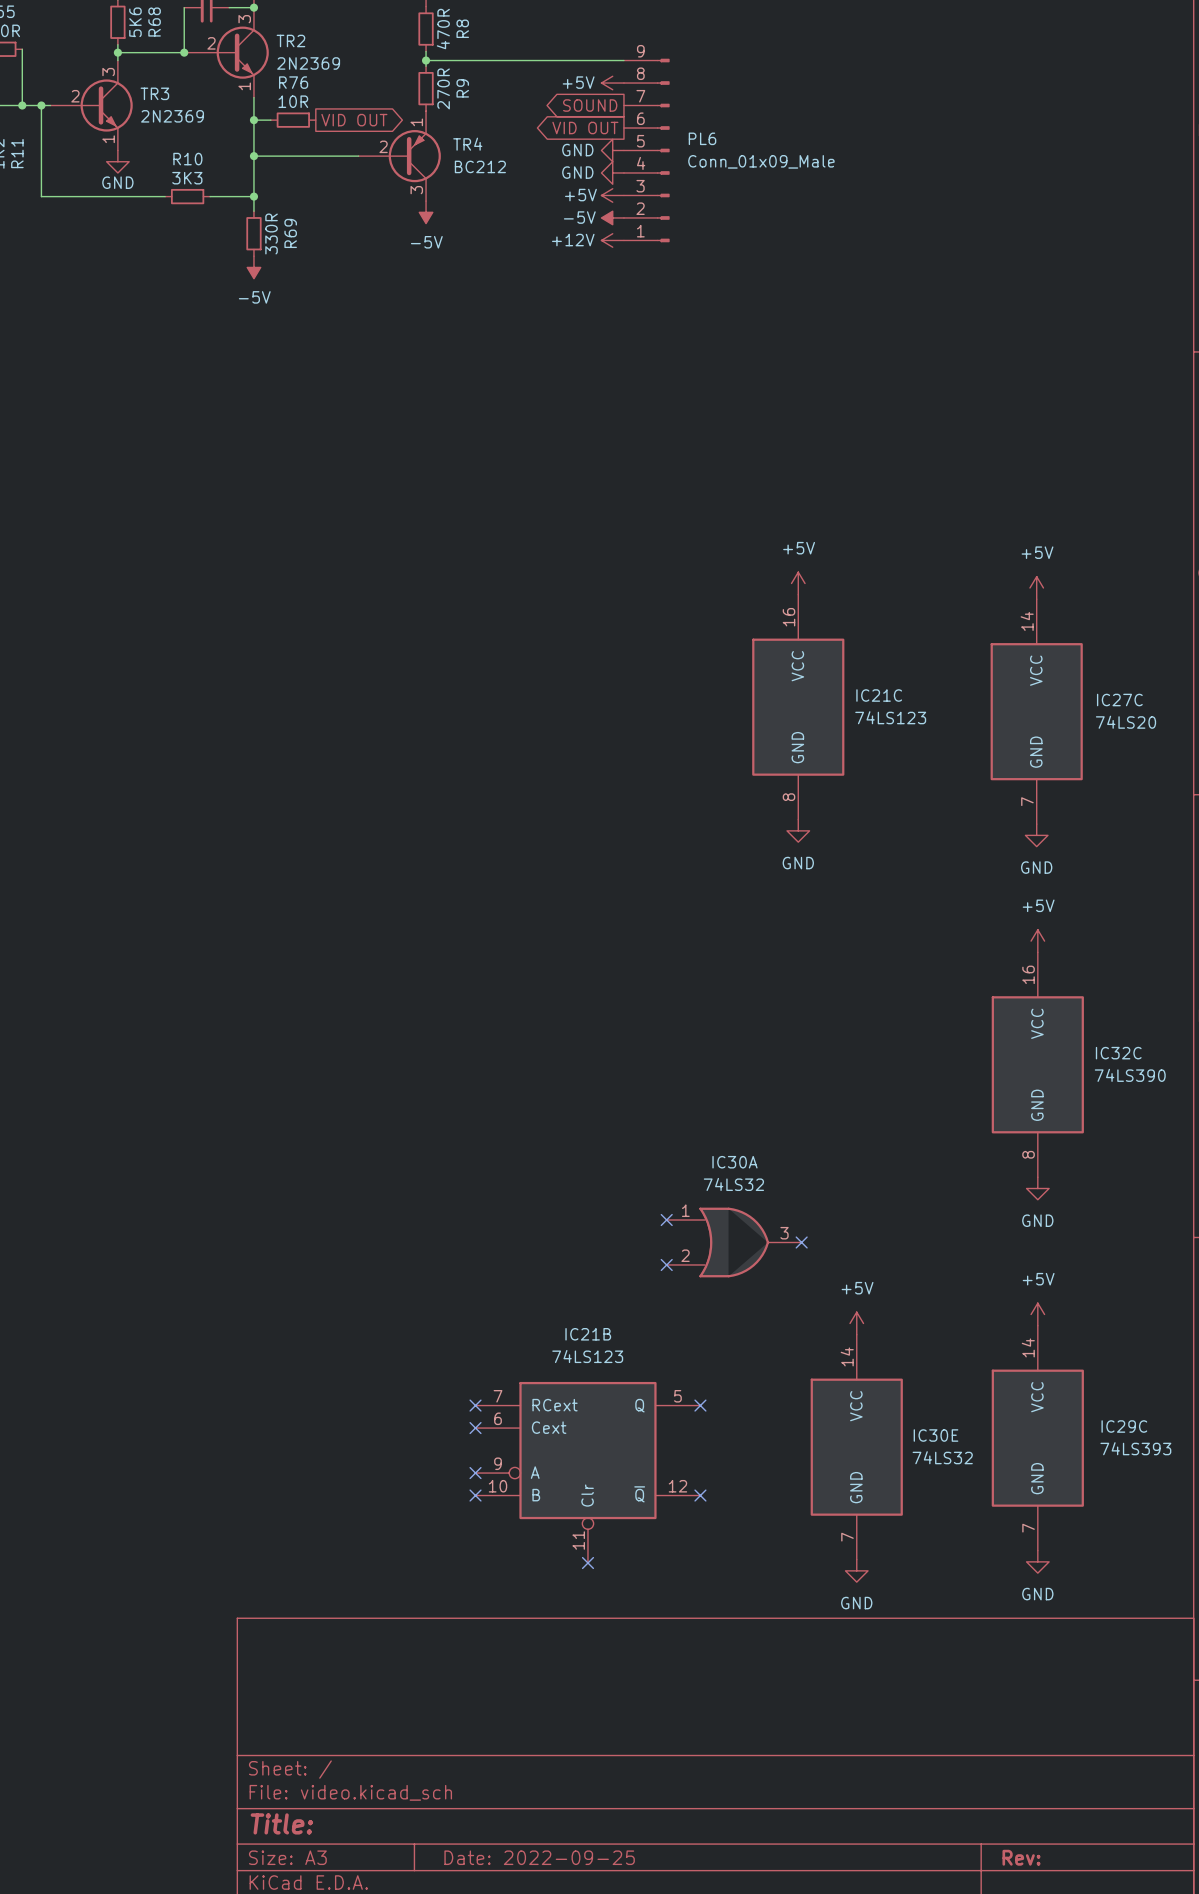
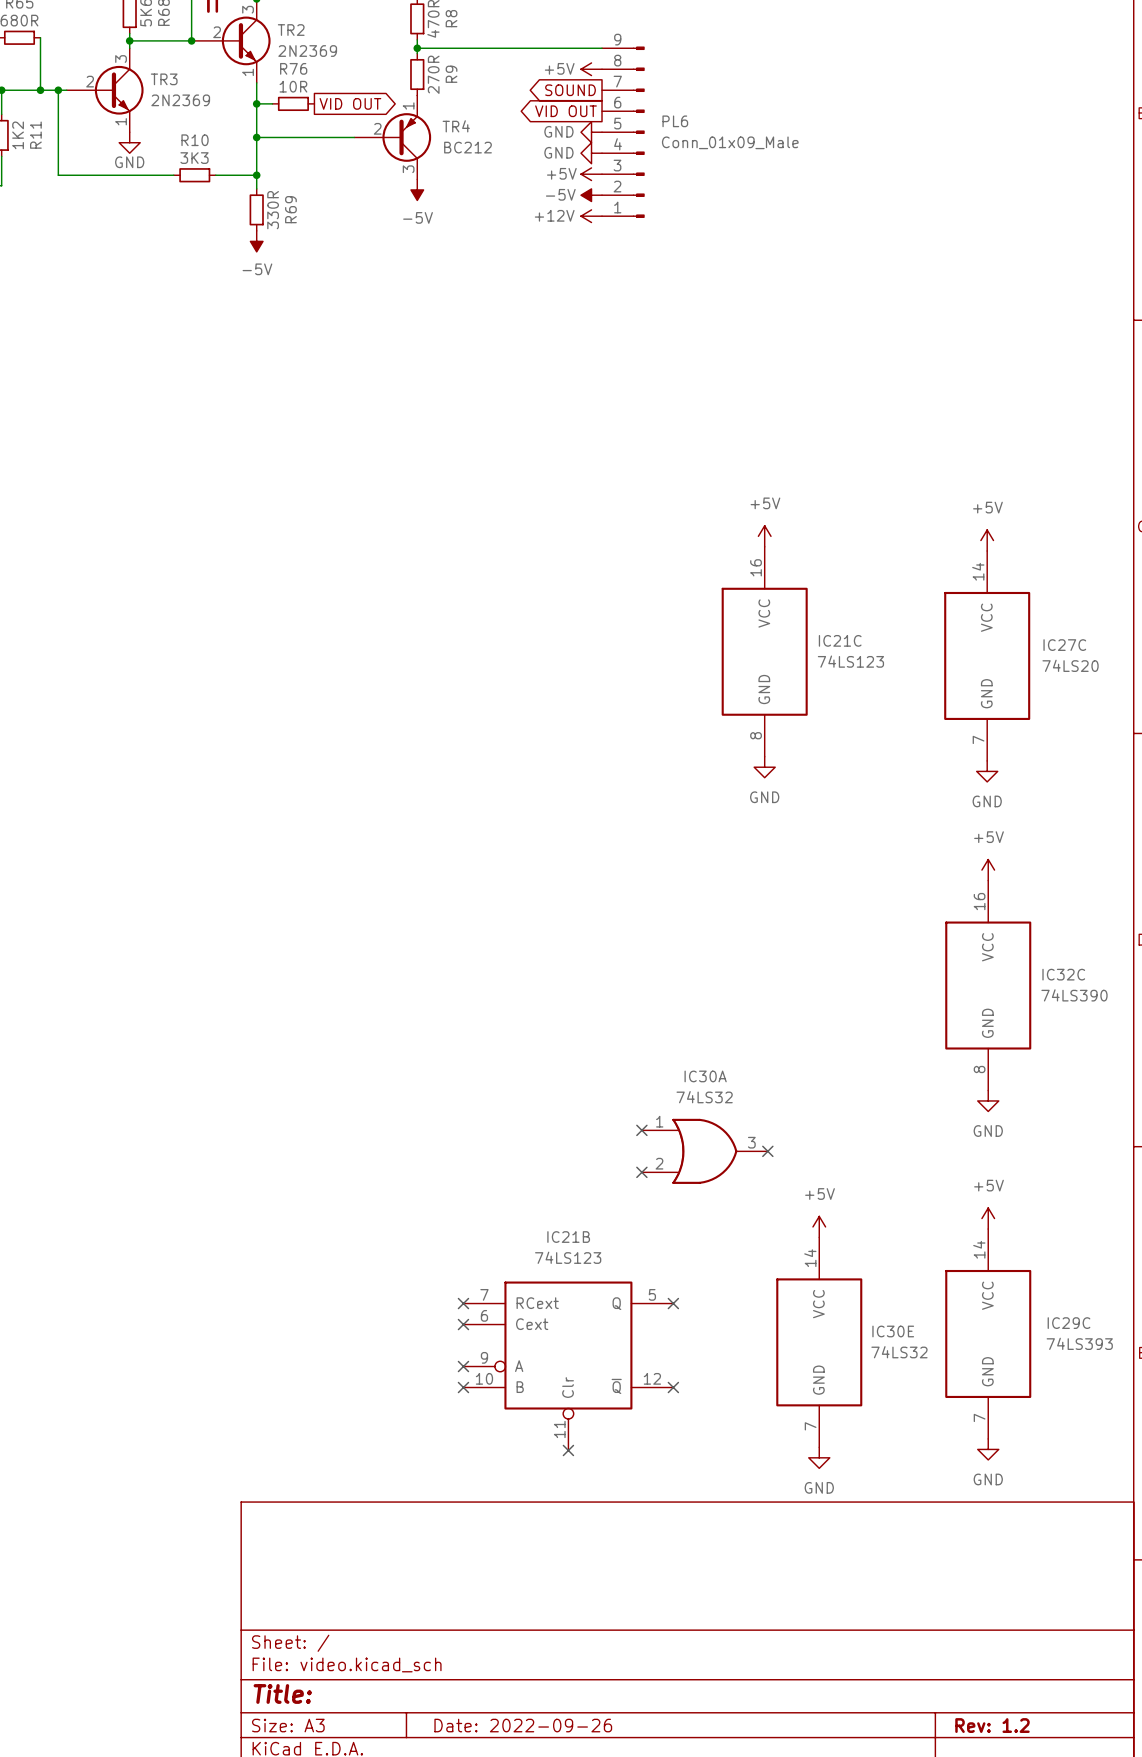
title block: Date: 2022-09-25 (539, 1857) -> Date: 2022-09-26 (523, 1725)
title block: Rev: (1021, 1857) -> Rev: 1.2 (992, 1725)

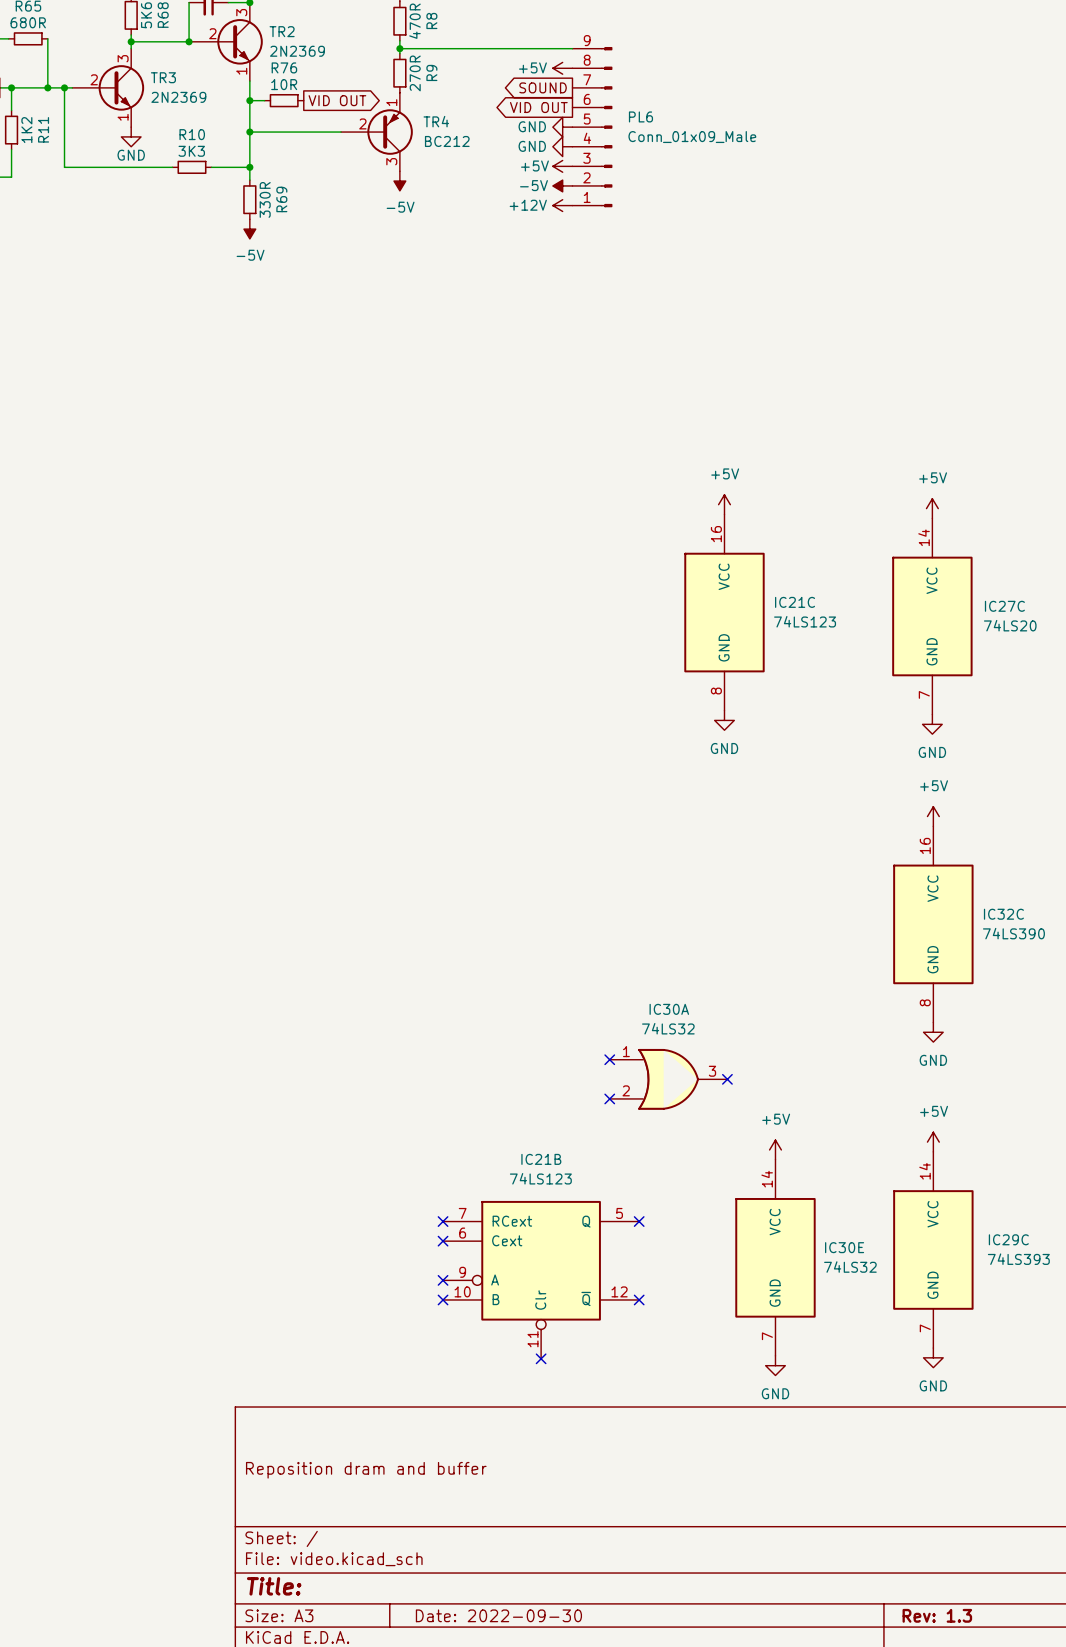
title block: none -> Reposition dram and buffer (366, 1470)
title block: Date: 2022-09-26 (523, 1725) -> Date: 2022-09-30 (498, 1615)
title block: Rev: 1.2 (992, 1725) -> Rev: 1.3 (937, 1615)

